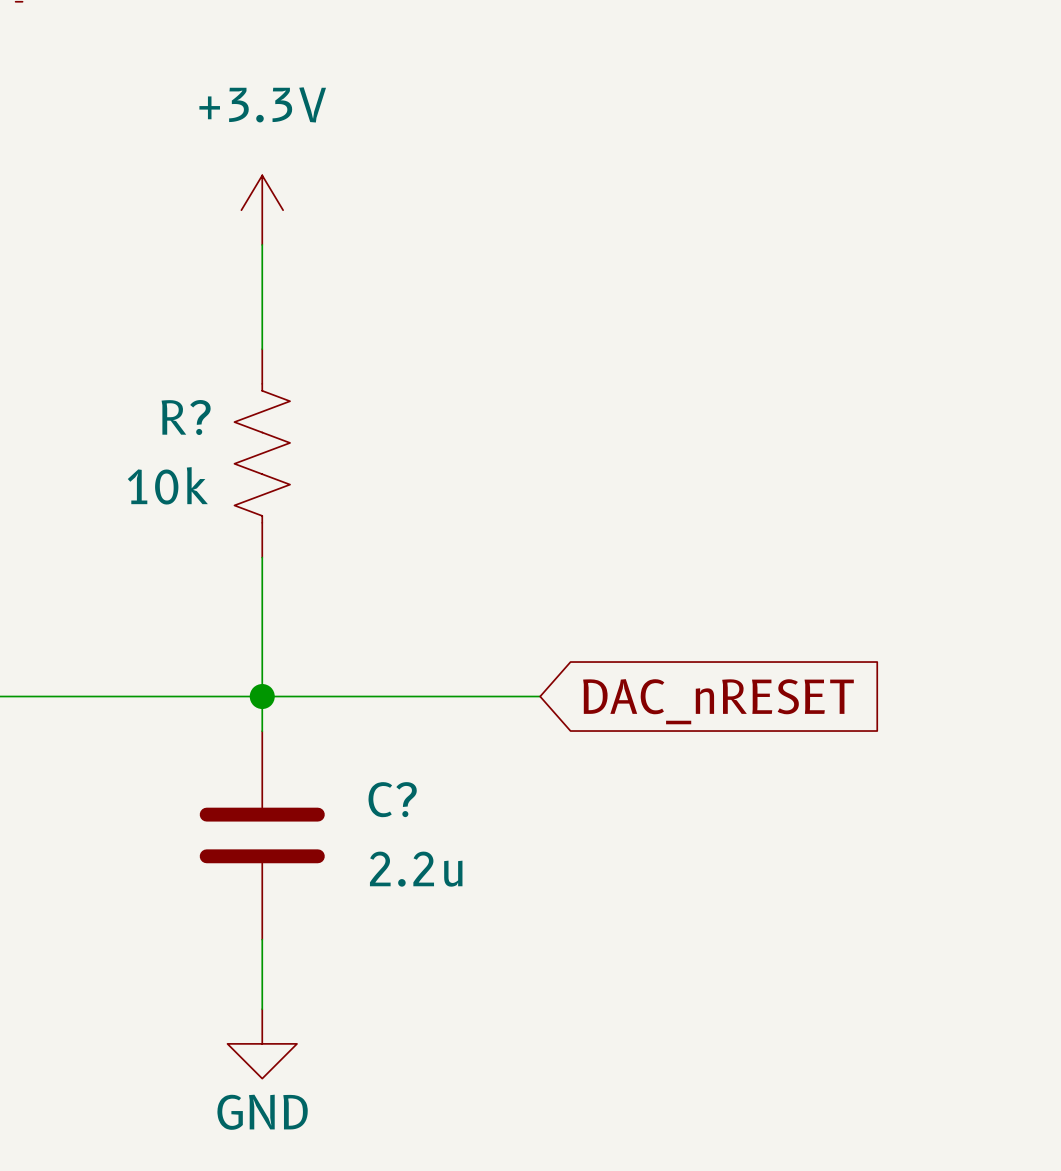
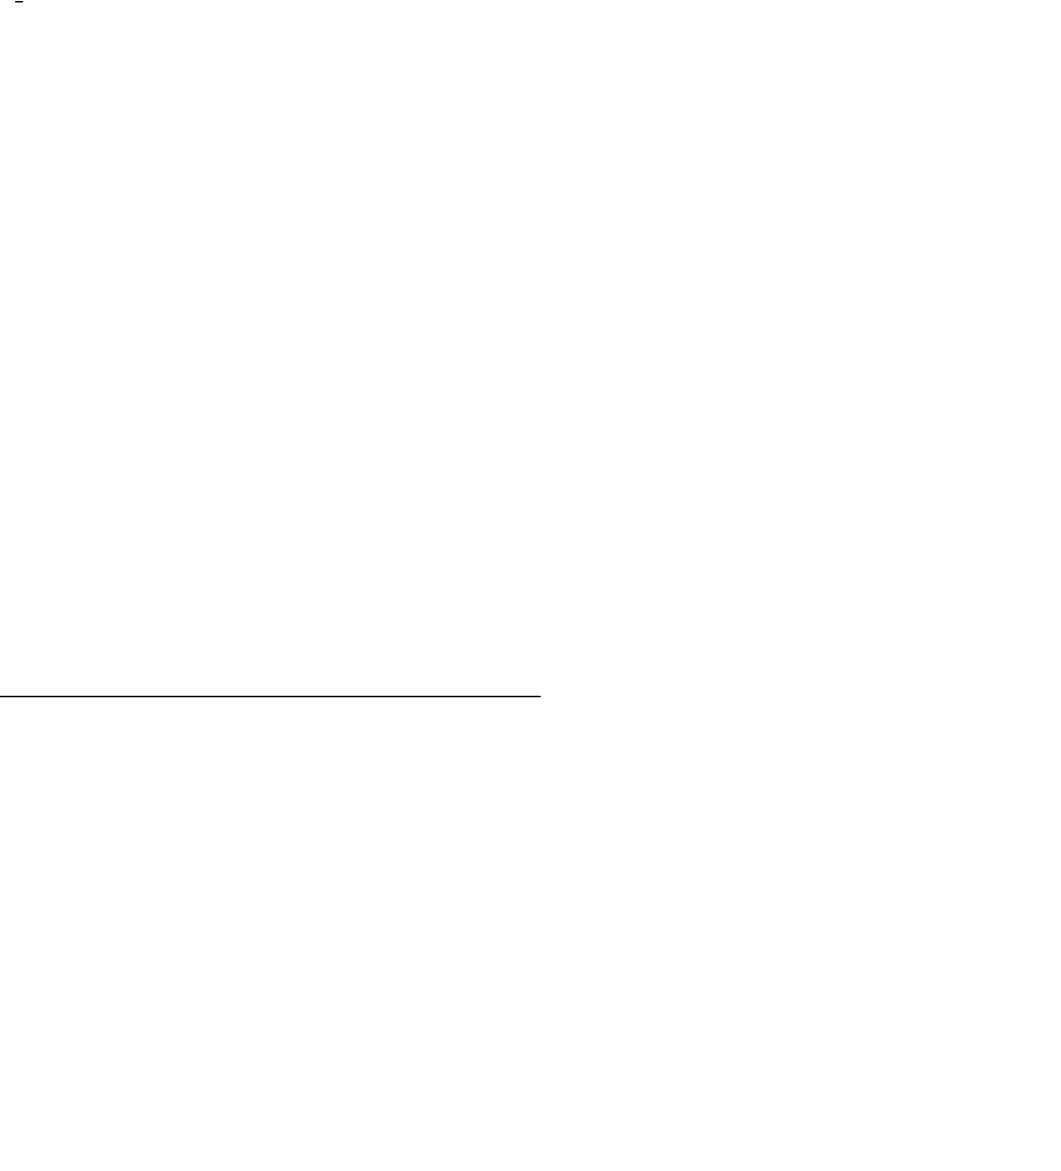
power symbol: +3.3V (262, 210) -> none
wire: (262, 244) (262, 349) -> none
R?: 10k (262, 453) -> none
wire: (262, 557) (262, 731) -> none
junction: (262, 696) -> none
global label: DAC_nRESET (718, 701) -> none
C?: 2.2u (262, 835) -> none
wire: (262, 939) (262, 1009) -> none
power symbol: GND (262, 1043) -> none

